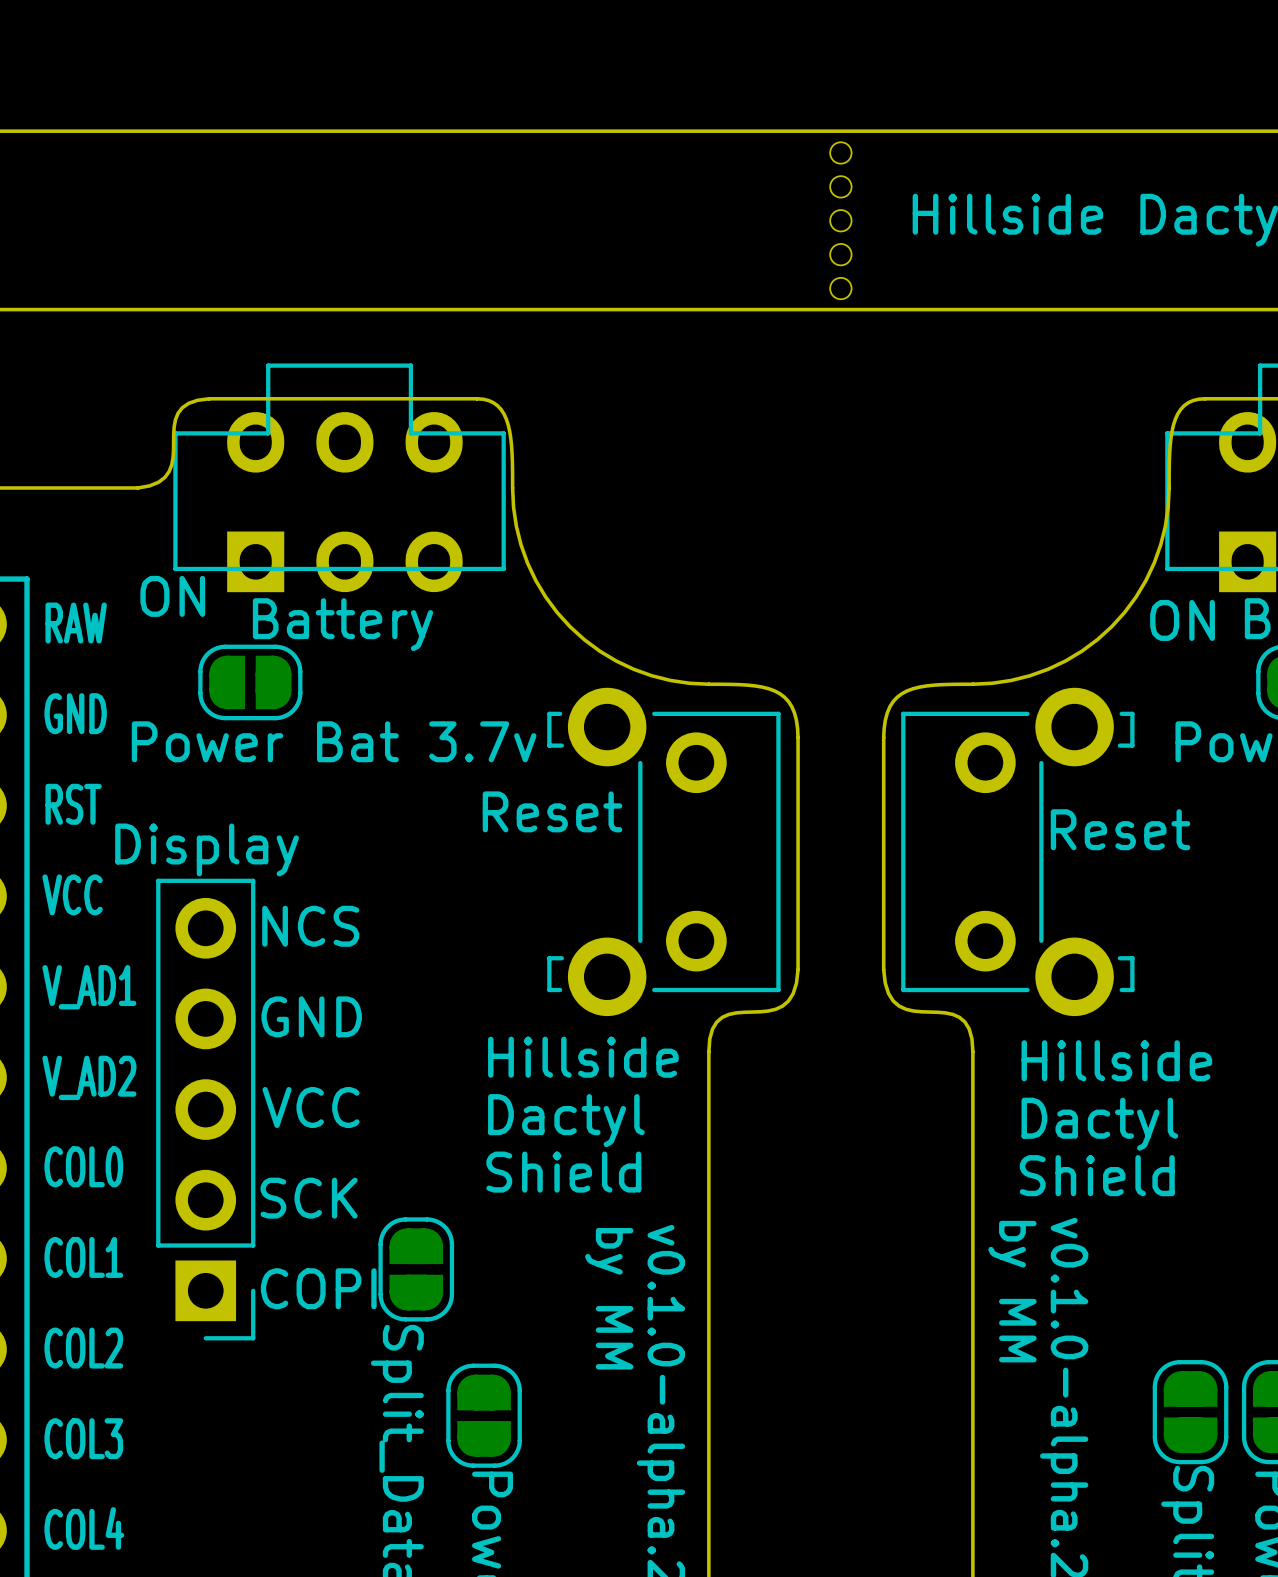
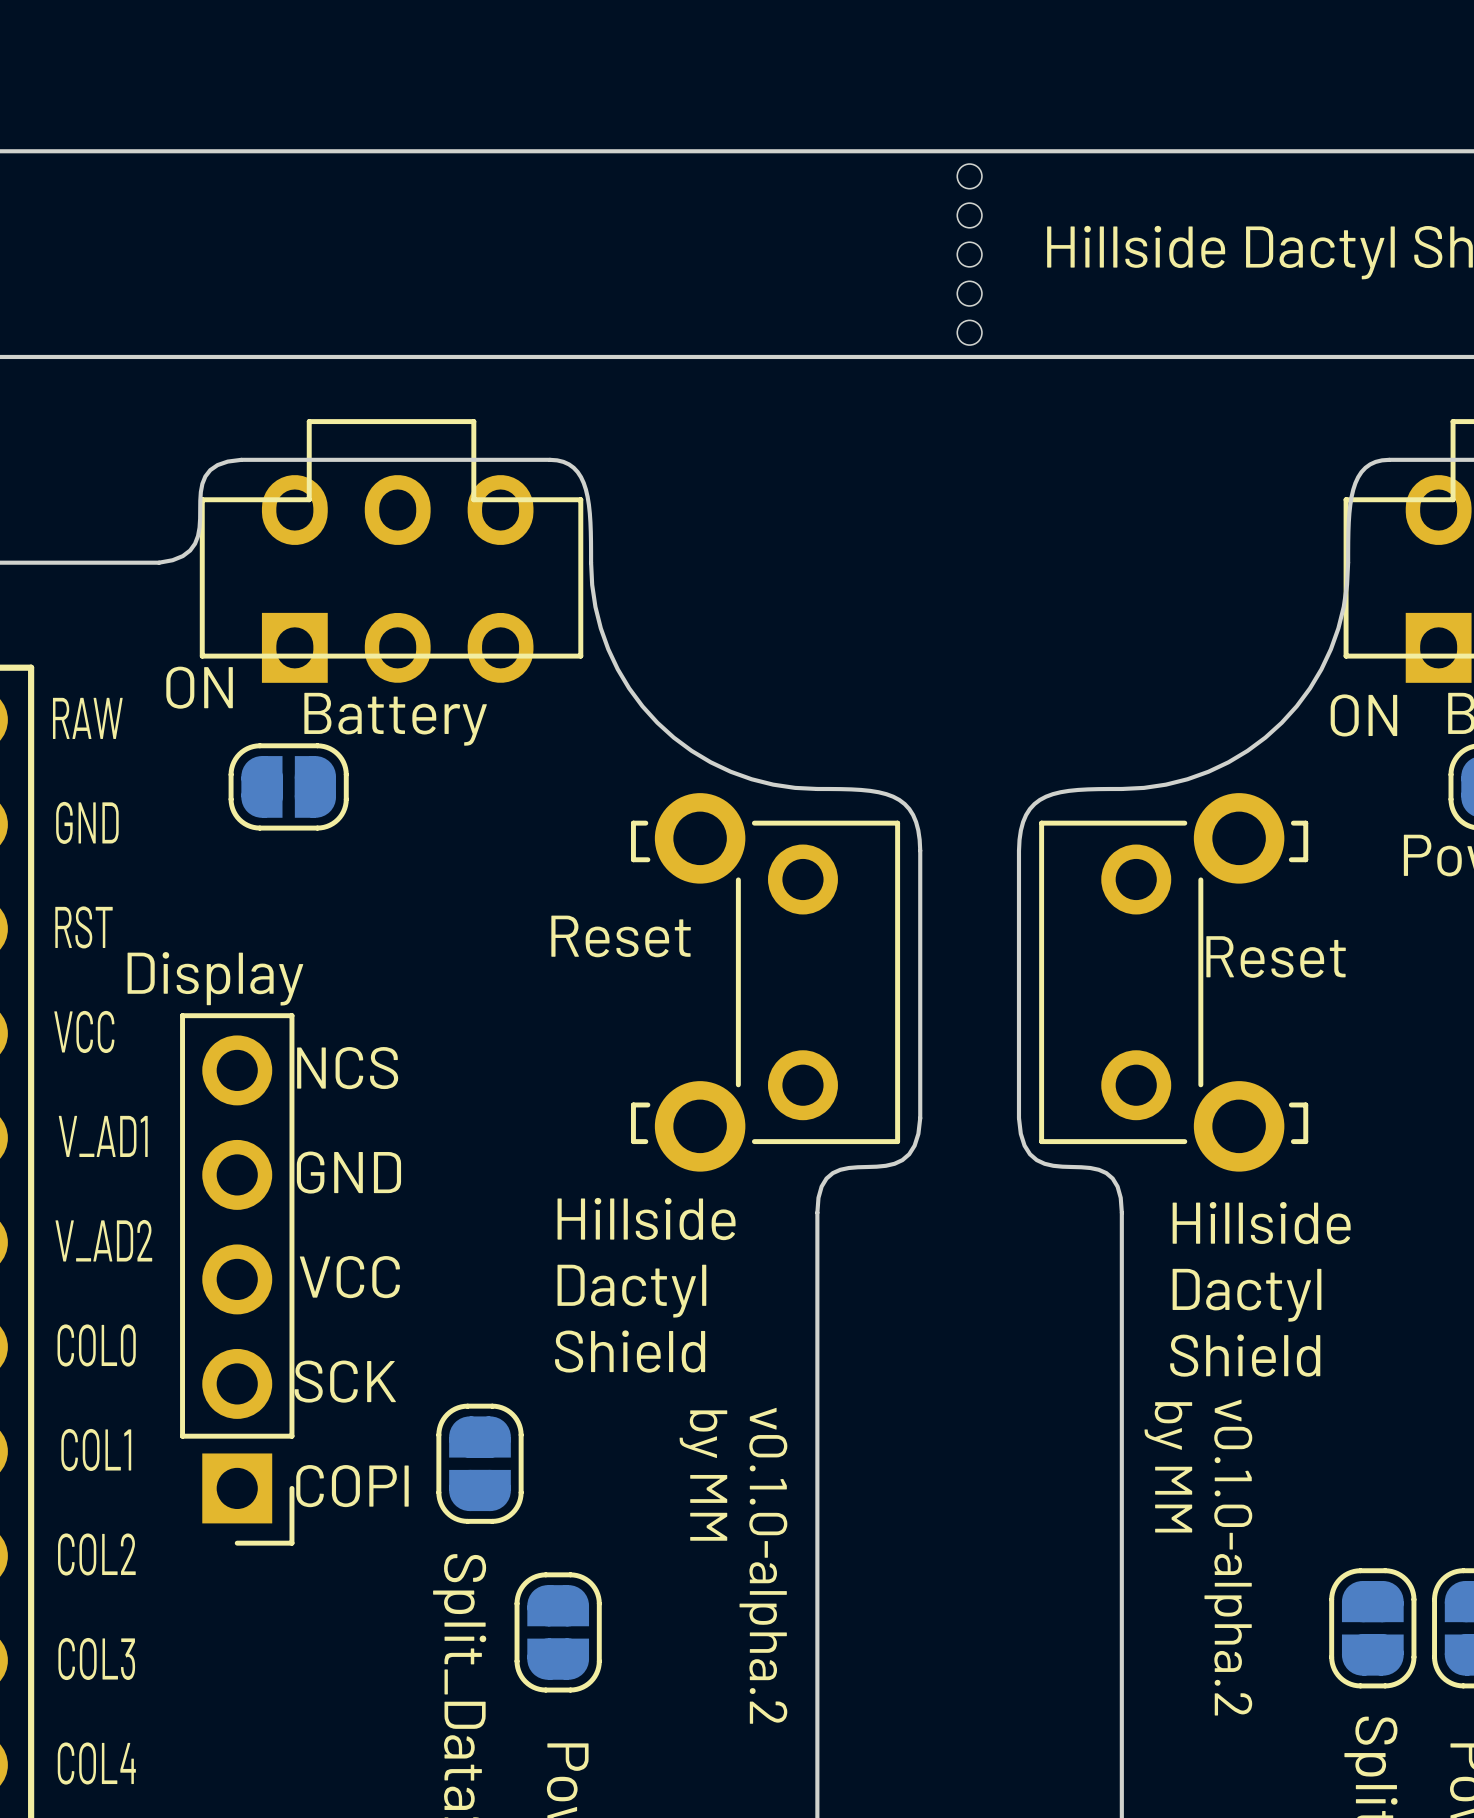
part value: Power Bat 3.7v (334, 741) -> none

